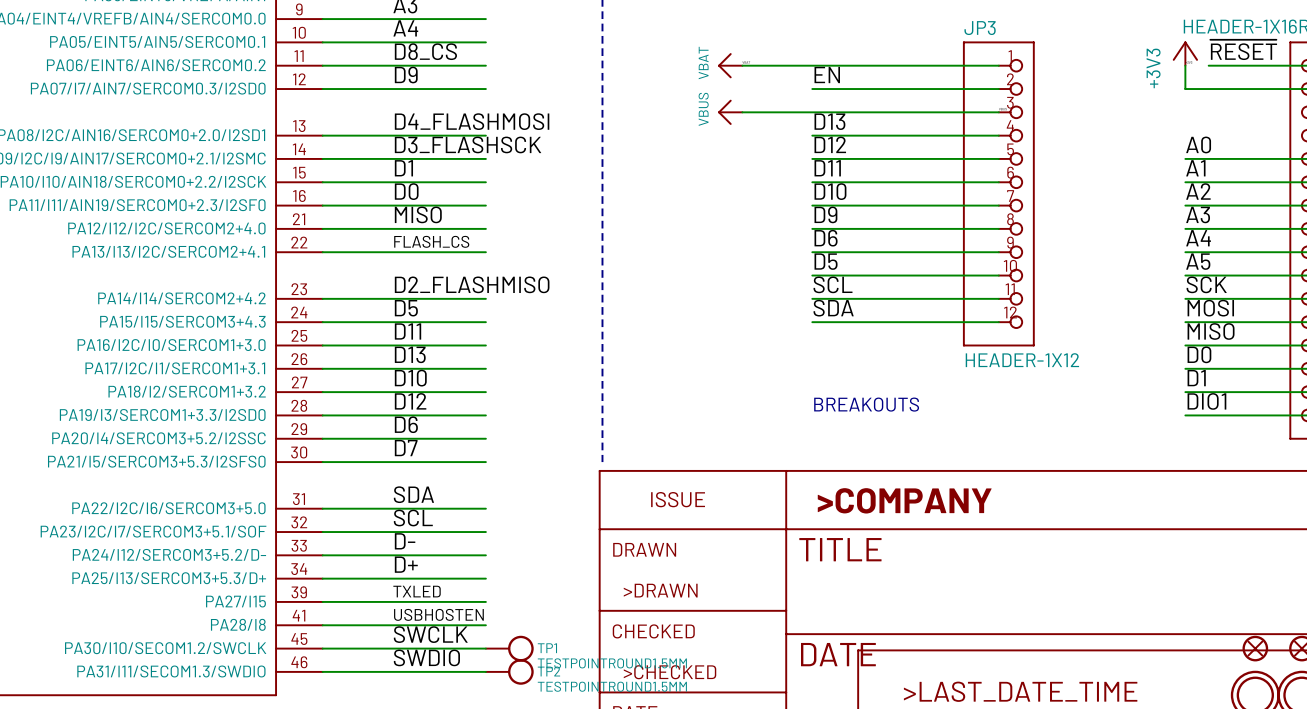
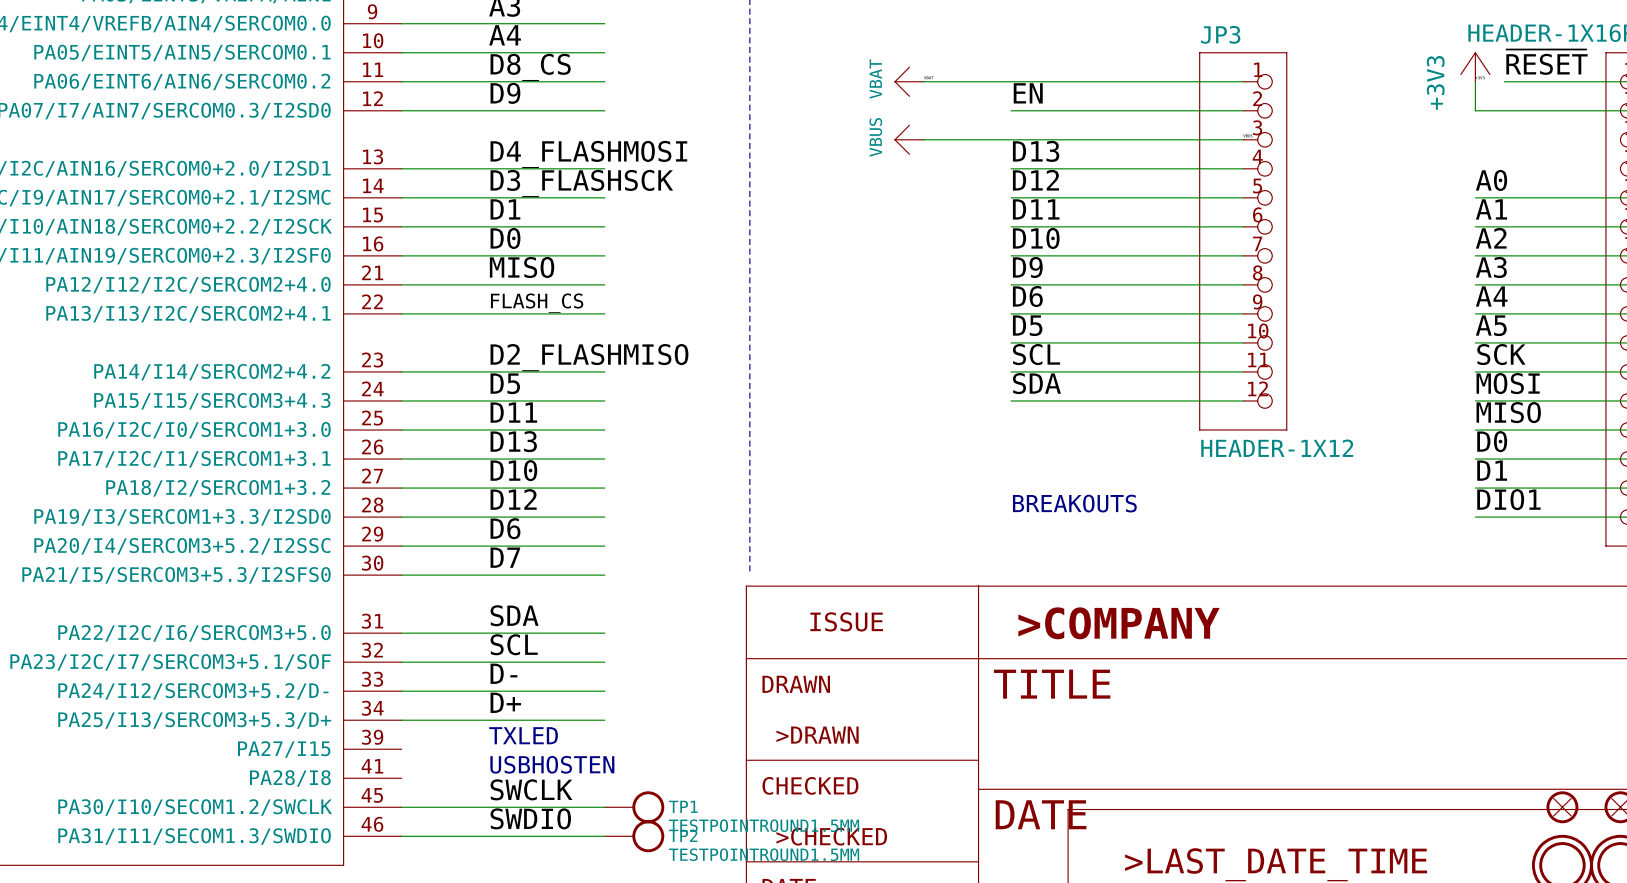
label: TXLED (417, 591) -> none
text: none -> TXLED (523, 735)
wire: (322, 601) (485, 601) -> none
label: USBHOSTEN (438, 614) -> none
text: none -> USBHOSTEN (552, 764)
wire: (322, 625) (485, 625) -> none

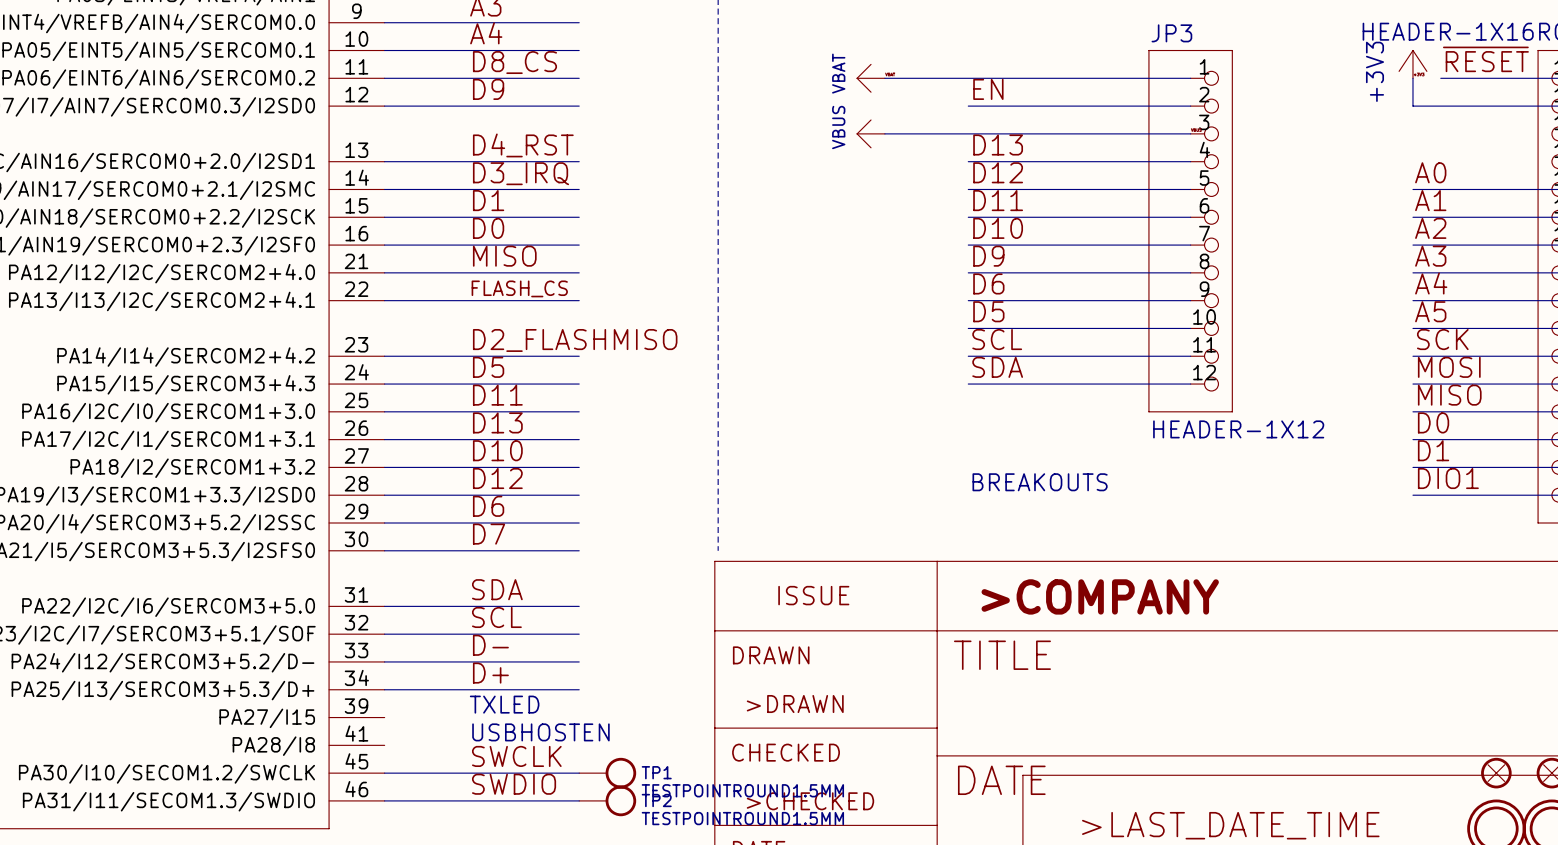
label: D4_FLASHMOSI (588, 154) -> D4_RST (523, 145)
label: D3_FLASHSCK (581, 183) -> D3_IRQ (521, 173)

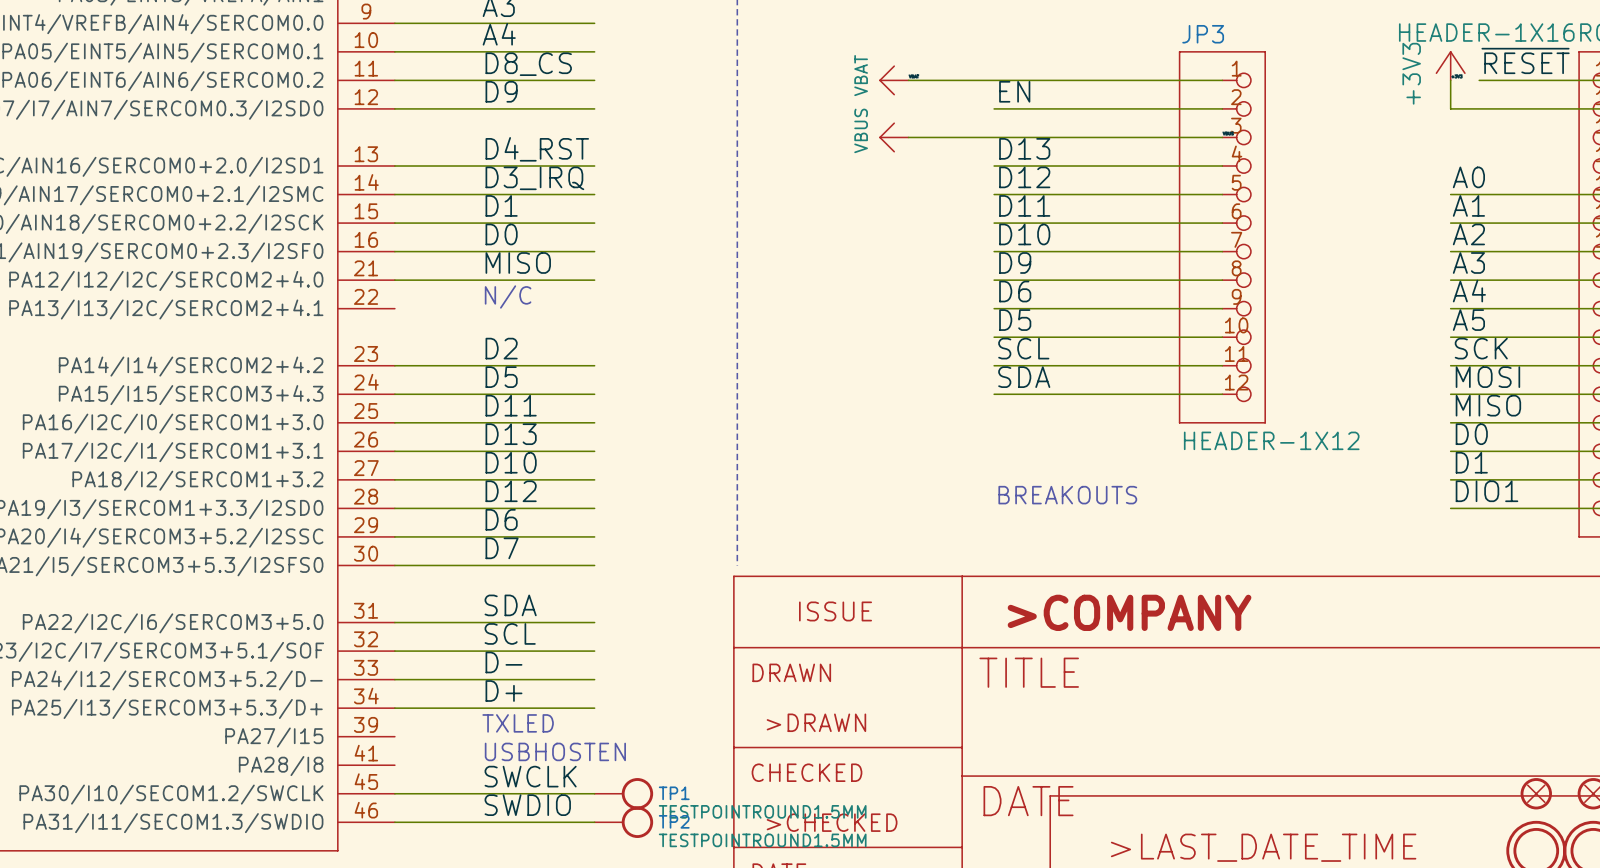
label: FLASH_CS (519, 288) -> none
text: none -> N/C (508, 296)
wire: (384, 300) (579, 300) -> none
label: D2_FLASHMISO (575, 340) -> D2 (501, 348)

